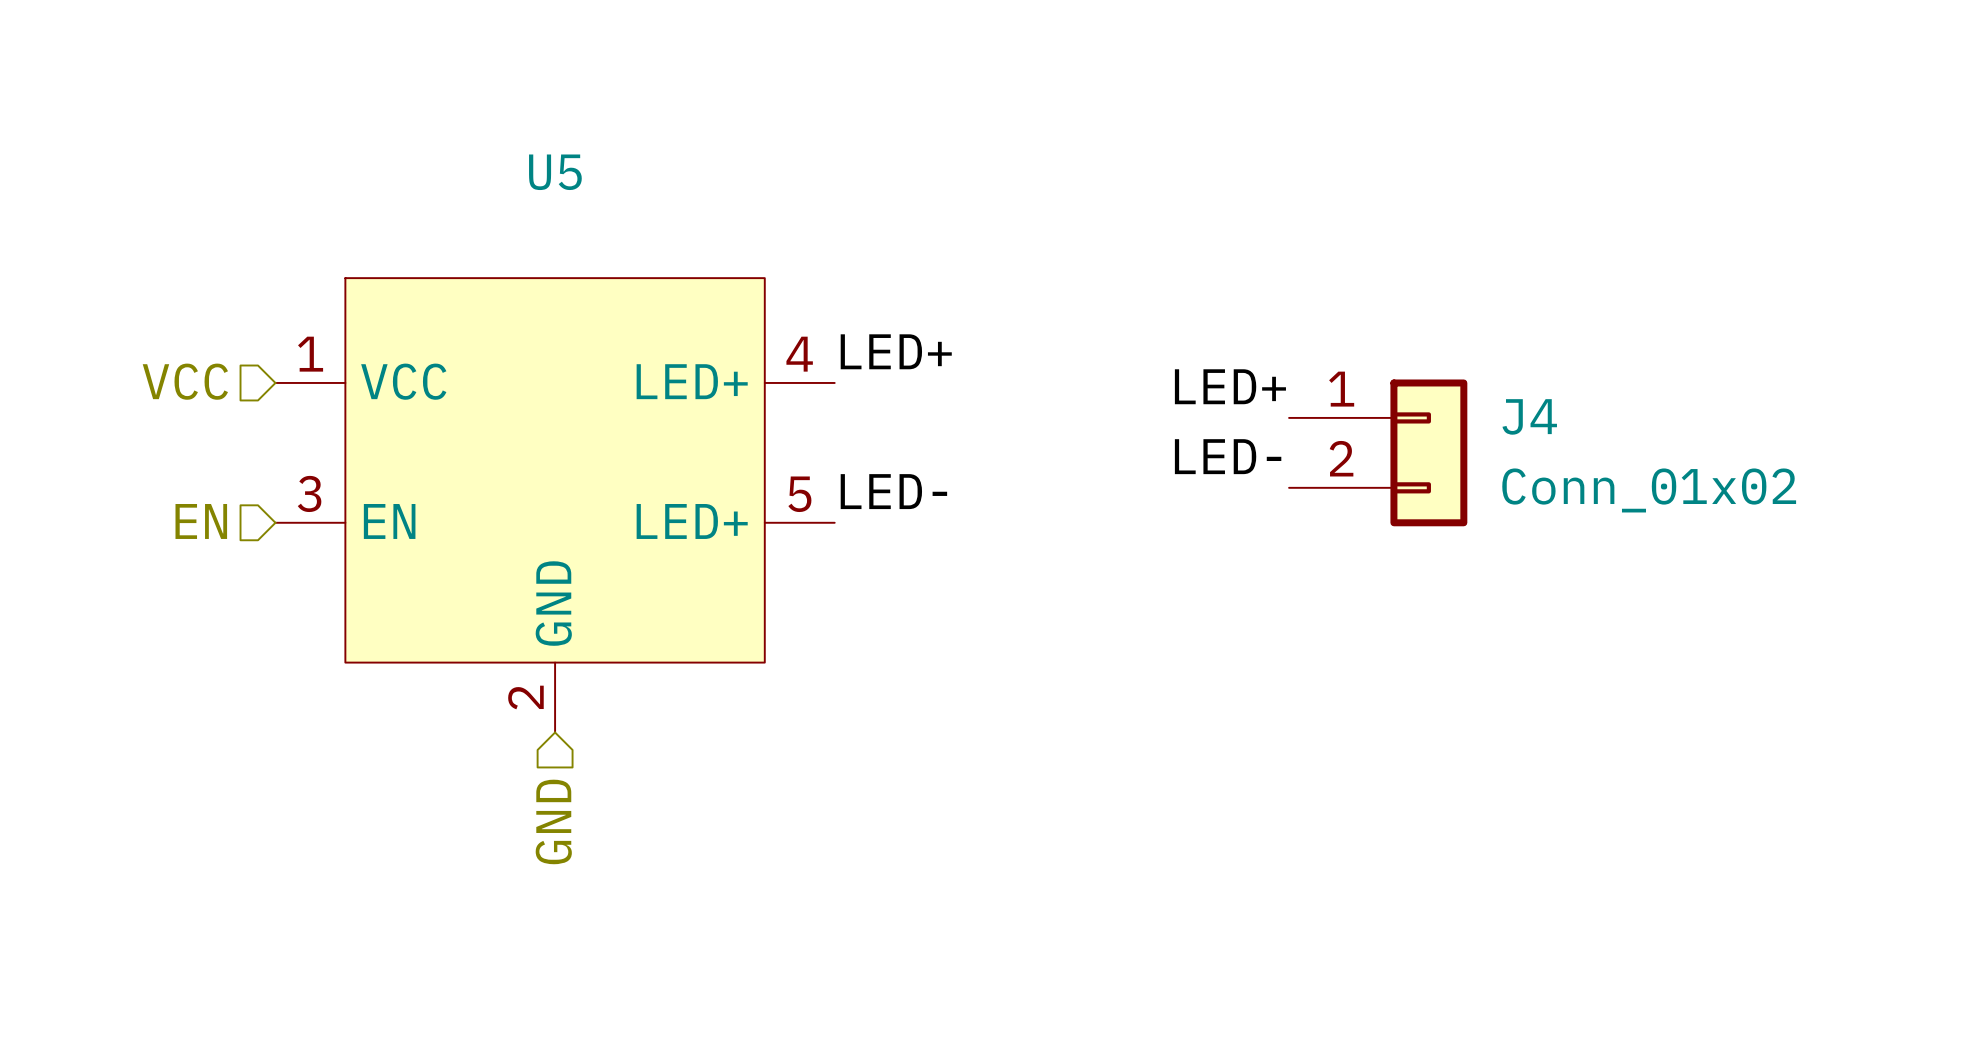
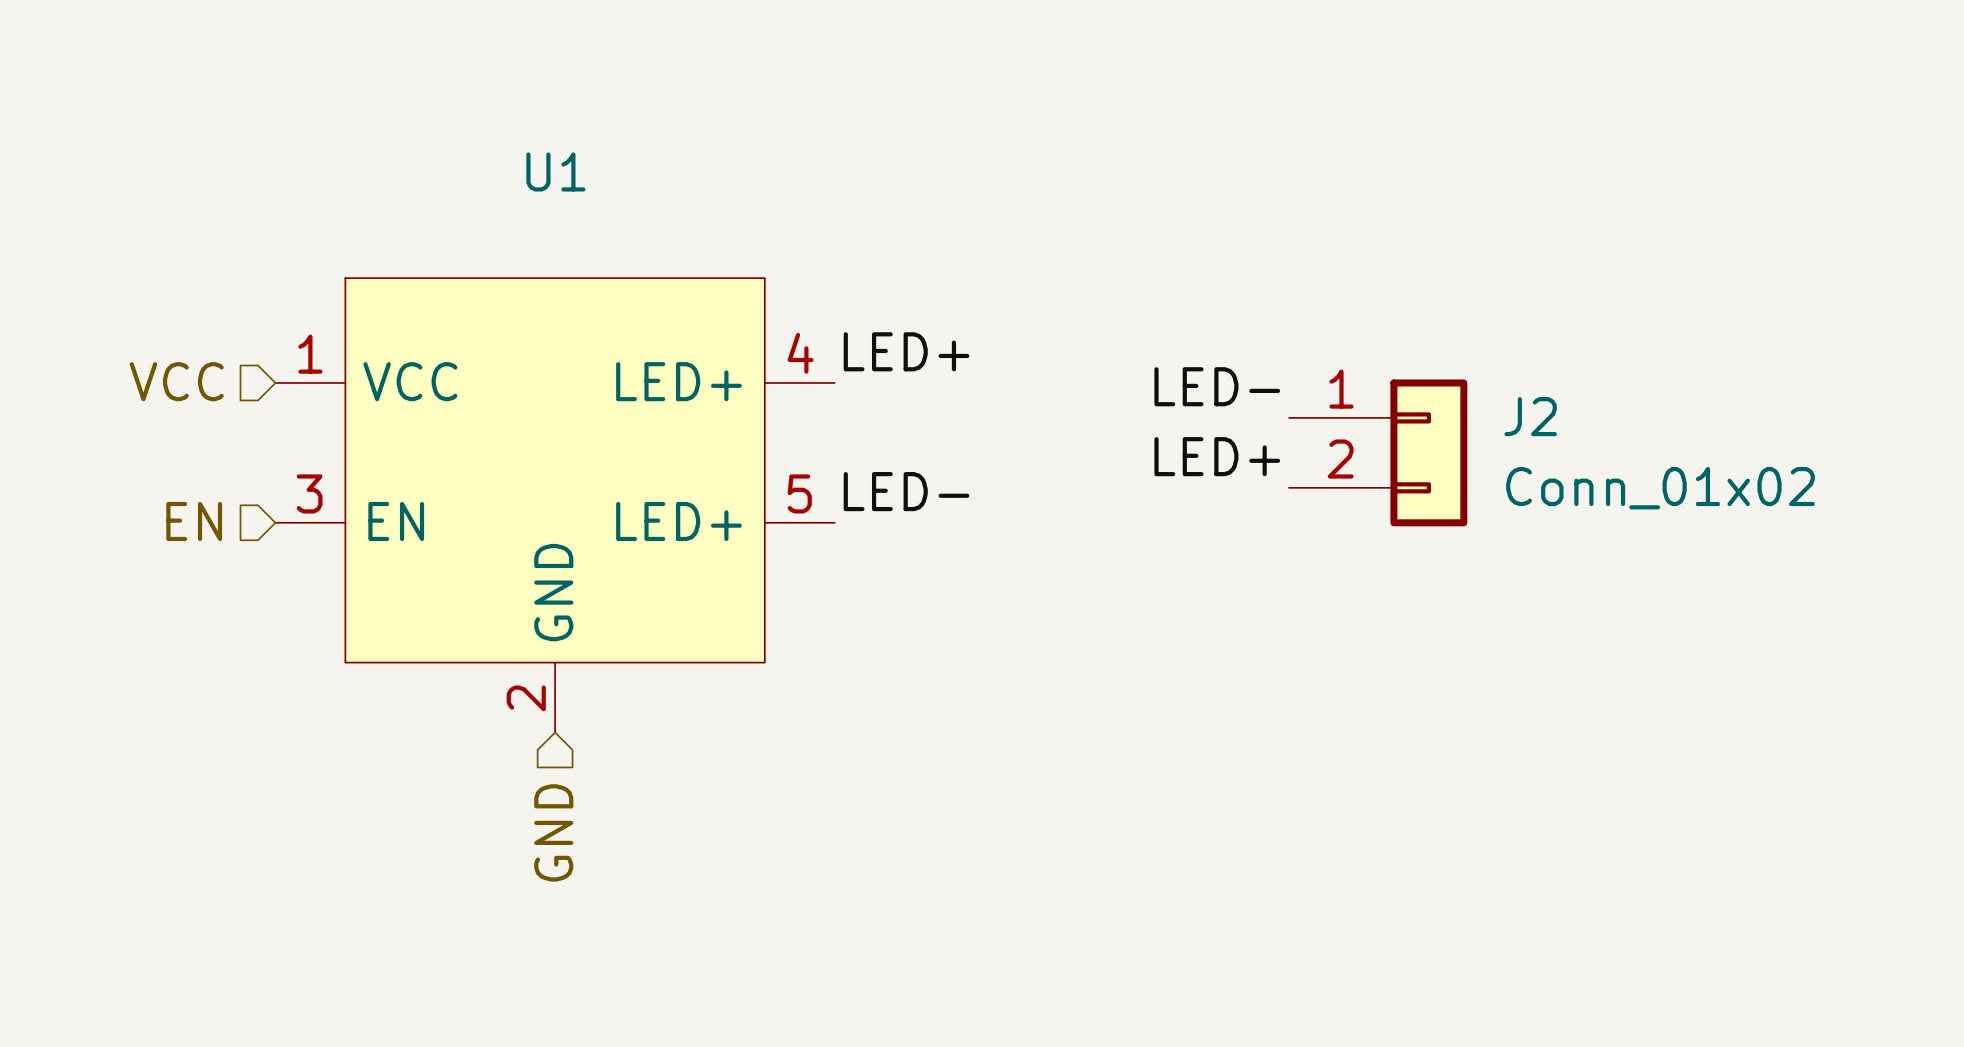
U5 name: U5 (555, 172) -> U1 (555, 171)
label: LED+ (1230, 386) -> LED- (1217, 386)
J4 name: J4 (1529, 416) -> J2 (1530, 416)
label: LED- (1228, 456) -> LED+ (1217, 456)

